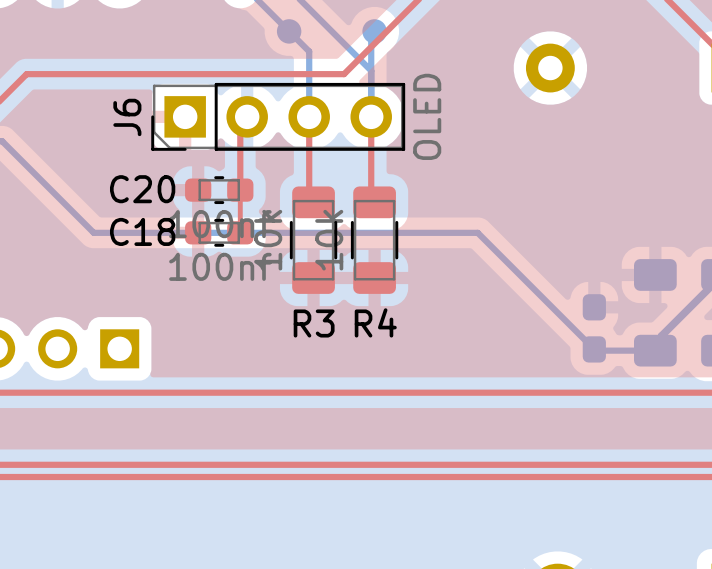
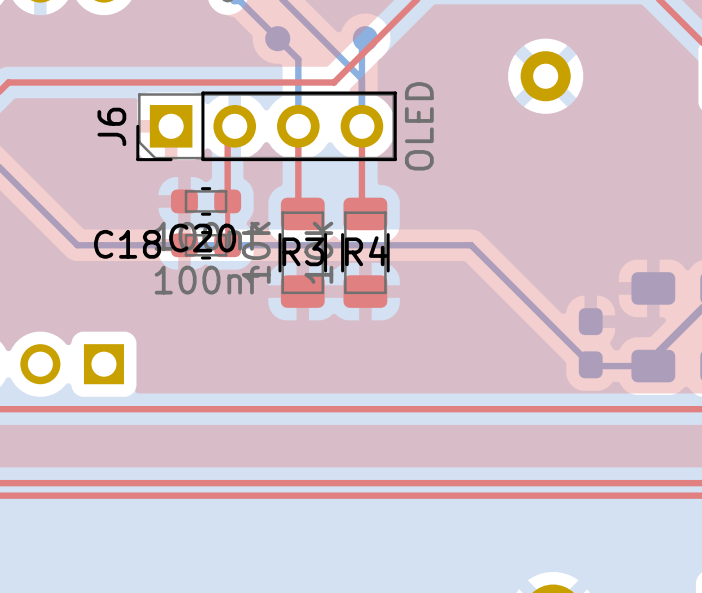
C20 name position: C20 (142, 189) -> C20 (202, 238)
R4 name position: R4 (375, 322) -> R4 (366, 251)
R3 name position: R3 (314, 323) -> R3 (303, 251)

